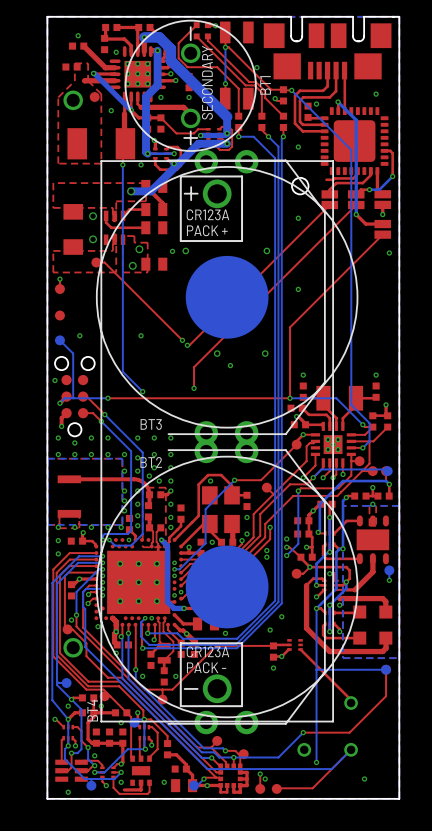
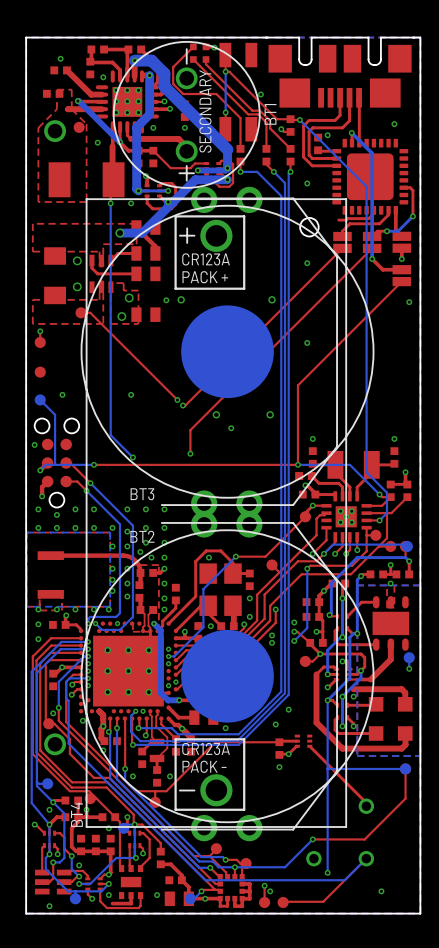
part: (129, 524) -> none
via: (137, 525) -> none
top track: (129, 529) (135, 535) (135, 540) -> none

